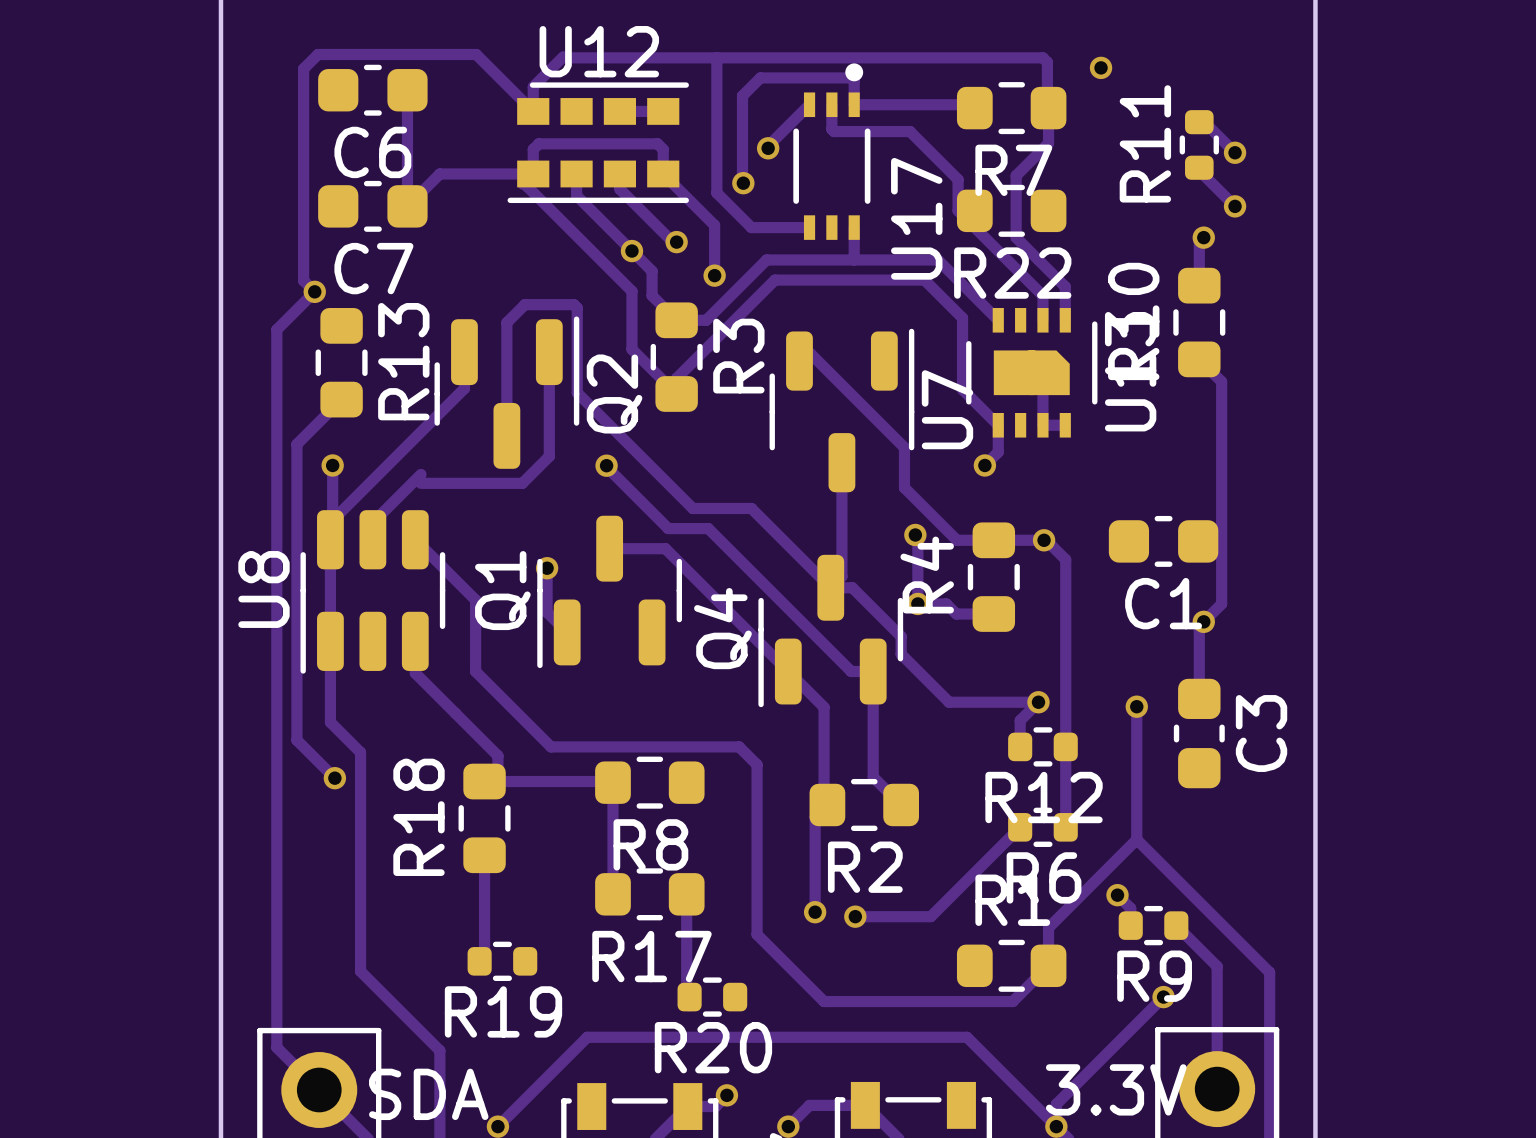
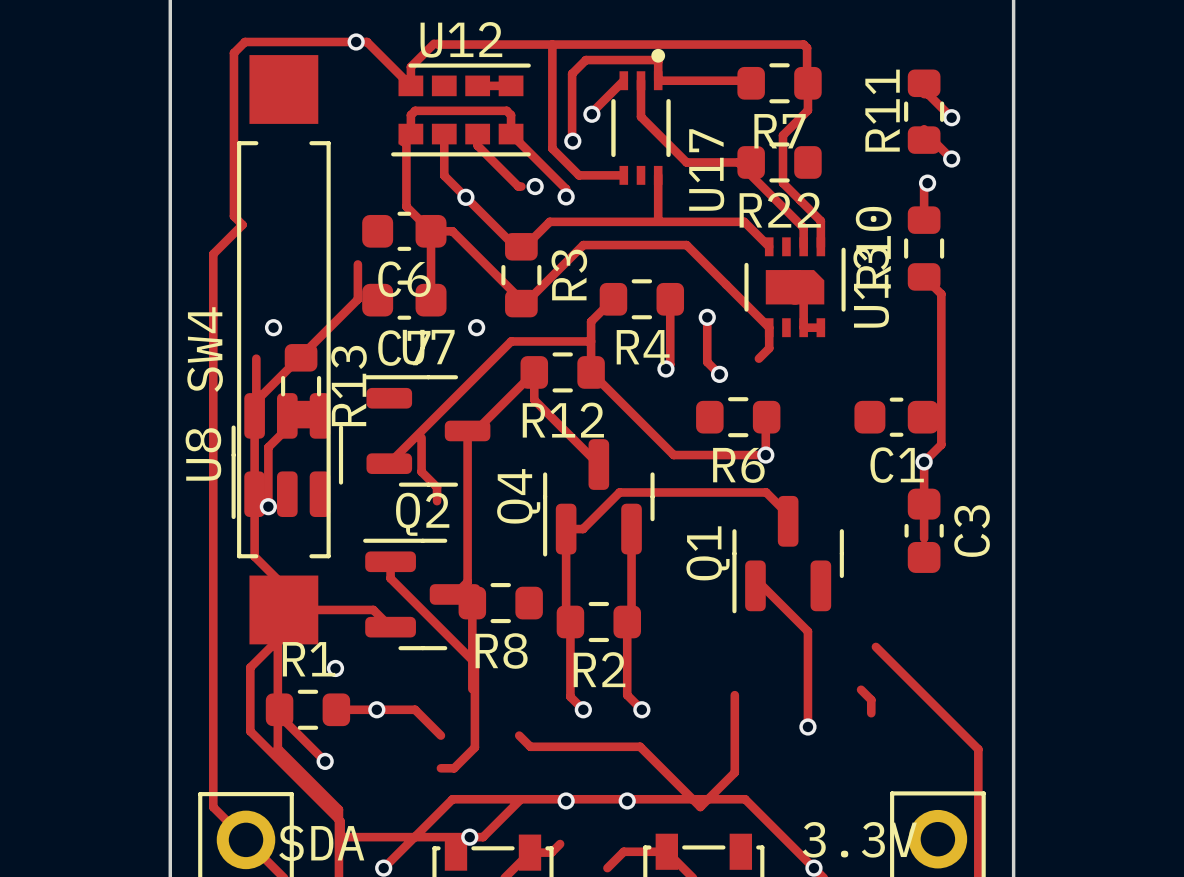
via: none -> (356, 41)
via: (1101, 67) -> none
C6 position: (372, 90) -> (404, 231)
track: (407, 90) (407, 206) (439, 173) (533, 173) -> none
R11 footprint: [1179, 110, 1219, 180] -> [904, 69, 945, 154]
track: (831, 129) (834, 131) (910, 131) (958, 179) (958, 210) -> (641, 99) (641, 116) (686, 162) (738, 162)
track: (527, 186) (631, 291) (631, 349) (676, 394) (676, 378) (774, 280) (924, 280) (962, 318) (962, 389) -> (431, 231) (452, 231) (524, 303) (583, 245) (686, 245) (741, 300)
track: none -> (406, 143) (406, 206) (431, 231)
track: (576, 195) (652, 271) (652, 295) (676, 320) -> (444, 150) (444, 175) (515, 246) (521, 246)
C7 position: (372, 206) -> (404, 300)
track: (714, 225) (714, 275) -> (550, 173) (566, 189) (566, 196)
via position: (676, 242) -> (535, 186)
via position: (631, 251) -> (465, 197)
track: none -> (658, 200) (658, 218)
via position: (714, 275) -> (566, 196)
track: (965, 287) (937, 259) (766, 259) (706, 320) (681, 320) -> (744, 221) (549, 221) (524, 246)
via: (314, 291) -> none
track: none -> (431, 231) (430, 300)
track: (549, 352) (549, 456) (522, 483) (421, 483) -> none
track: (799, 353) (810, 353) (904, 447) (904, 487) (956, 540) (1046, 540) (1065, 559) (1065, 827) -> none
R13 position: (341, 362) -> (301, 386)
track: none -> (613, 299) (591, 321) (591, 372) (673, 455) (765, 455) (766, 417)
track: none -> (670, 299) (670, 364) (665, 368)
Q2 rotation: 0° (506, 392) -> 90° counterclockwise (421, 594)
Q2 position: (506, 392) -> (421, 594)
track: (341, 399) (296, 444) (296, 740) (334, 778) -> none
U7 rotation: 0° (841, 410) -> 90° counterclockwise (427, 430)
U7 position: (841, 410) -> (427, 430)
track: none -> (707, 317) (707, 362) (719, 374)
via: none -> (707, 317)
track: (506, 426) (506, 322) (524, 304) (573, 304) (577, 308) (577, 392) (692, 508) (751, 508) (830, 587) -> none
track: none -> (591, 341) (511, 341) (389, 463)
SW4: none -> (283, 349)
track: (841, 462) (841, 576) (830, 587) -> none
via position: (332, 465) -> (273, 327)
track: (606, 465) (668, 528) (708, 528) (851, 671) (873, 671) (873, 777) (901, 804) -> none
via position: (606, 465) -> (476, 327)
via: (984, 465) -> none
track: (421, 474) (372, 522) (372, 539) -> none
via: none -> (665, 368)
via: none -> (719, 374)
track: (915, 534) (917, 537) (917, 603) (946, 603) (956, 614) (993, 614) -> none
via: (915, 534) -> none
track: none -> (301, 414) (268, 447) (268, 506)
track: (415, 539) (475, 600) (475, 671) (550, 746) (739, 746) (757, 764) (757, 934) (824, 1001) (1012, 1001) (1048, 965) (1048, 943) -> none
via: (1044, 540) -> none
track: (609, 548) (665, 548) (824, 707) (824, 801) (827, 804) (815, 817) (815, 912) -> none
via: (547, 568) -> none
R4 name position: R4 (927, 575) -> R4 (643, 347)
R4 rotation: 0° (993, 577) -> 90° clockwise (641, 299)
R4 position: (993, 577) -> (641, 299)
track: (1221, 577) (1221, 603) (1199, 626) -> (941, 444) (924, 461) (924, 482)
track: (830, 587) (852, 587) (901, 636) (901, 654) (949, 702) (1038, 702) (1020, 720) (1020, 746) -> none
via: none -> (765, 455)
Q1 position: (609, 591) -> (788, 554)
track: none -> (598, 464) (534, 399) (534, 372) (475, 430) (467, 430) (467, 581) (455, 594)
via: (917, 603) -> none
via position: (1203, 621) -> (924, 461)
Q4 position: (830, 630) -> (598, 497)
track: (415, 641) (415, 673) (497, 755) (497, 781) -> none
via: none -> (268, 506)
track: none -> (788, 514) (766, 492) (619, 492) (583, 529) (566, 529)
track: none -> (566, 530) (566, 628) (570, 632)
track: none -> (631, 530) (631, 617) (627, 622) (627, 695) (641, 709)
via: (1038, 702) -> none
track: (1136, 706) (1136, 839) (1048, 927) -> (755, 578) (807, 631) (807, 714)
via: (1136, 706) -> none
R12 footprint: [1008, 727, 1078, 767] -> [520, 352, 605, 393]
track: none -> (390, 561) (390, 578) (474, 662) (474, 747) (454, 768) (440, 768)
C3 position: (1199, 733) -> (924, 530)
via: (334, 778) -> none
track: (484, 781) (614, 781) -> none
track: none -> (283, 609) (373, 609) (390, 627)
R2 position: (864, 804) -> (598, 622)
track: none -> (570, 622) (570, 696) (583, 709)
R6 footprint: [1008, 807, 1078, 847] -> [696, 397, 781, 438]
R18: (484, 818) -> none
track: none -> (280, 637) (250, 667) (250, 731) (340, 821) (340, 837) (483, 837) (519, 800)
track: (1020, 827) (930, 916) (855, 916) -> none
track: (484, 855) (484, 956) (479, 961) -> none
via: none -> (335, 668)
R17: (649, 894) -> none
track: (686, 894) (686, 1003) (689, 1006) -> none
via: (1117, 895) -> none
track: none -> (734, 695) (734, 772) (700, 807) (640, 746) (530, 746) (519, 735)
via: (815, 912) -> none
via: (855, 916) -> none
track: none -> (279, 709) (279, 715) (325, 761)
track: none -> (336, 709) (415, 709) (440, 735)
via: none -> (376, 709)
via: none -> (583, 709)
via: none -> (641, 709)
R9: (1153, 925) -> none
track: (1176, 925) (1217, 966) (1217, 1089) -> none
via: none -> (807, 726)
R19: (502, 961) -> none
R1 position: (1011, 965) -> (307, 709)
via: none -> (325, 761)
R20: (712, 997) -> none
track: (1163, 997) (1056, 1104) (1056, 1126) -> none
via: (1163, 997) -> none
via: none -> (566, 800)
via: none -> (627, 800)
via: none -> (469, 837)
via: (726, 1095) -> none
via: (788, 1126) -> none

